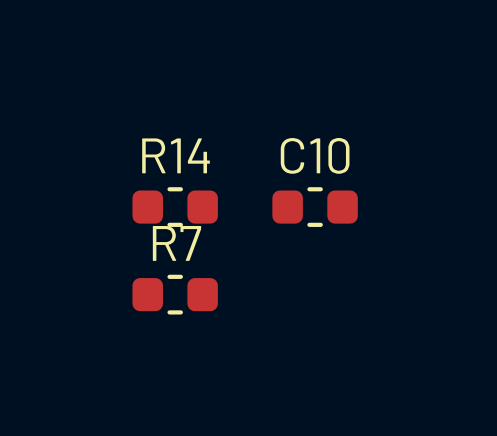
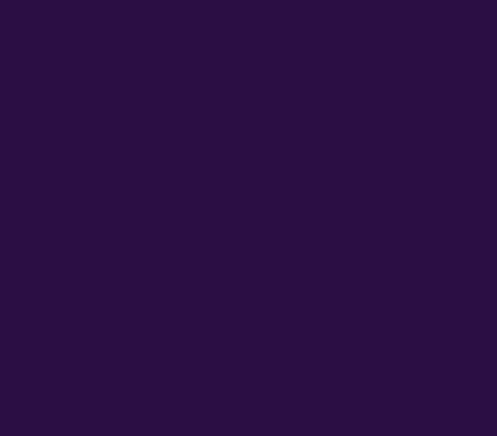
R14: (175, 207) -> none
C10: (315, 207) -> none
R7: (175, 294) -> none

